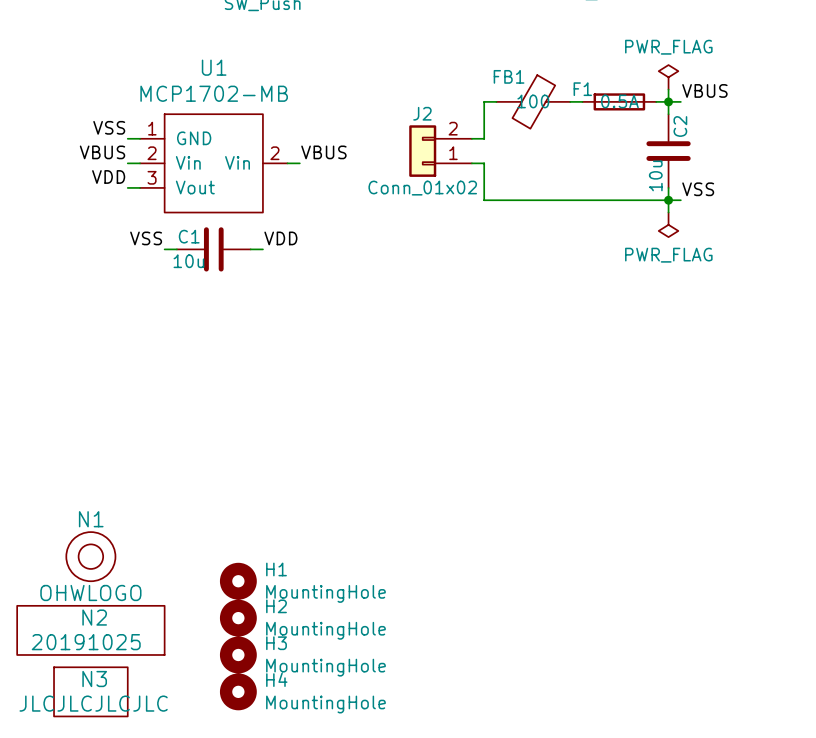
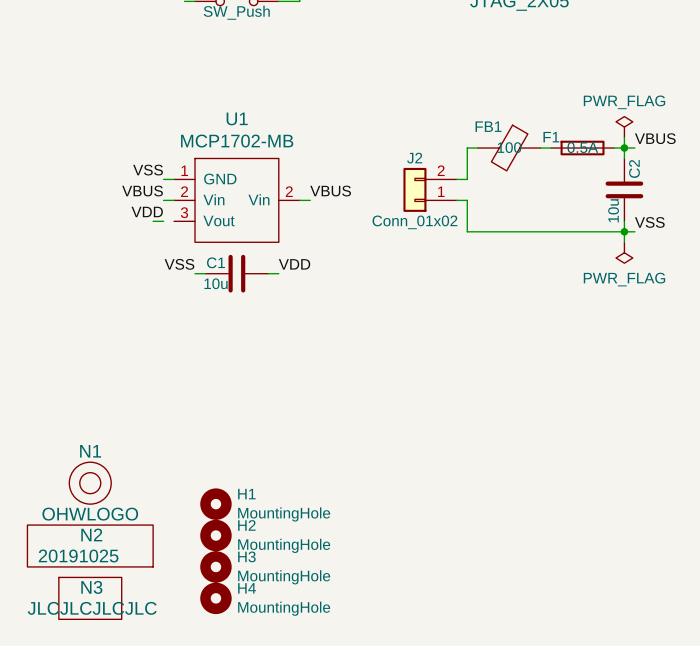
power symbol: PWR_FLAG (668, 77) -> none
wire: (668, 89) (668, 114) -> (624, 137) (624, 158)
label position: VBUS (704, 90) -> VBUS (655, 138)
wire: (496, 101) (484, 101) (484, 138) (471, 138) -> none
FB1 position: (533, 101) -> (509, 148)
wire: (570, 101) (582, 101) -> (540, 148) (551, 148)
F1 position: (619, 101) -> (582, 148)
wire: (656, 101) (680, 101) -> (613, 148) (634, 148)
junction: (668, 101) -> none
label: VSS (109, 127) -> none
wire: (127, 138) (140, 138) -> (163, 179) (174, 179)
power symbol: none -> PWR_FLAG (624, 127)
J2 position: (440, 151) -> (430, 189)
C2 position: (668, 151) -> (624, 189)
label: VBUS (102, 152) -> none
label: VBUS (323, 152) -> none
wire: (127, 163) (140, 163) -> (163, 200) (174, 200)
U1 position: (213, 163) -> (236, 200)
wire: (287, 163) (299, 163) -> (299, 200) (310, 200)
wire: (471, 163) (484, 163) (484, 200) (521, 200) -> none
junction: none -> (624, 148)
label: VDD (108, 176) -> none
wire: (127, 187) (140, 187) -> (195, 273) (205, 273)
wire: (668, 187) (668, 212) -> (624, 221) (624, 242)
label: none -> VSS (148, 170)
label position: VSS (698, 189) -> VSS (649, 222)
wire: (533, 200) (680, 200) -> (467, 179) (467, 148) (477, 148)
junction: (668, 200) -> none
label: none -> VBUS (142, 191)
label: none -> VBUS (330, 191)
wire: none -> (456, 200) (467, 200) (467, 231) (634, 231)
power symbol: PWR_FLAG (668, 224) -> none
label: VSS (146, 238) -> none
label: none -> VDD (147, 211)
label: VDD (280, 238) -> none
C1 position: (213, 249) -> (236, 273)
wire: (250, 249) (262, 249) -> (268, 273) (278, 273)
junction: none -> (624, 231)
power symbol: none -> PWR_FLAG (624, 252)
label: none -> VSS (179, 264)
label: none -> VDD (294, 264)

